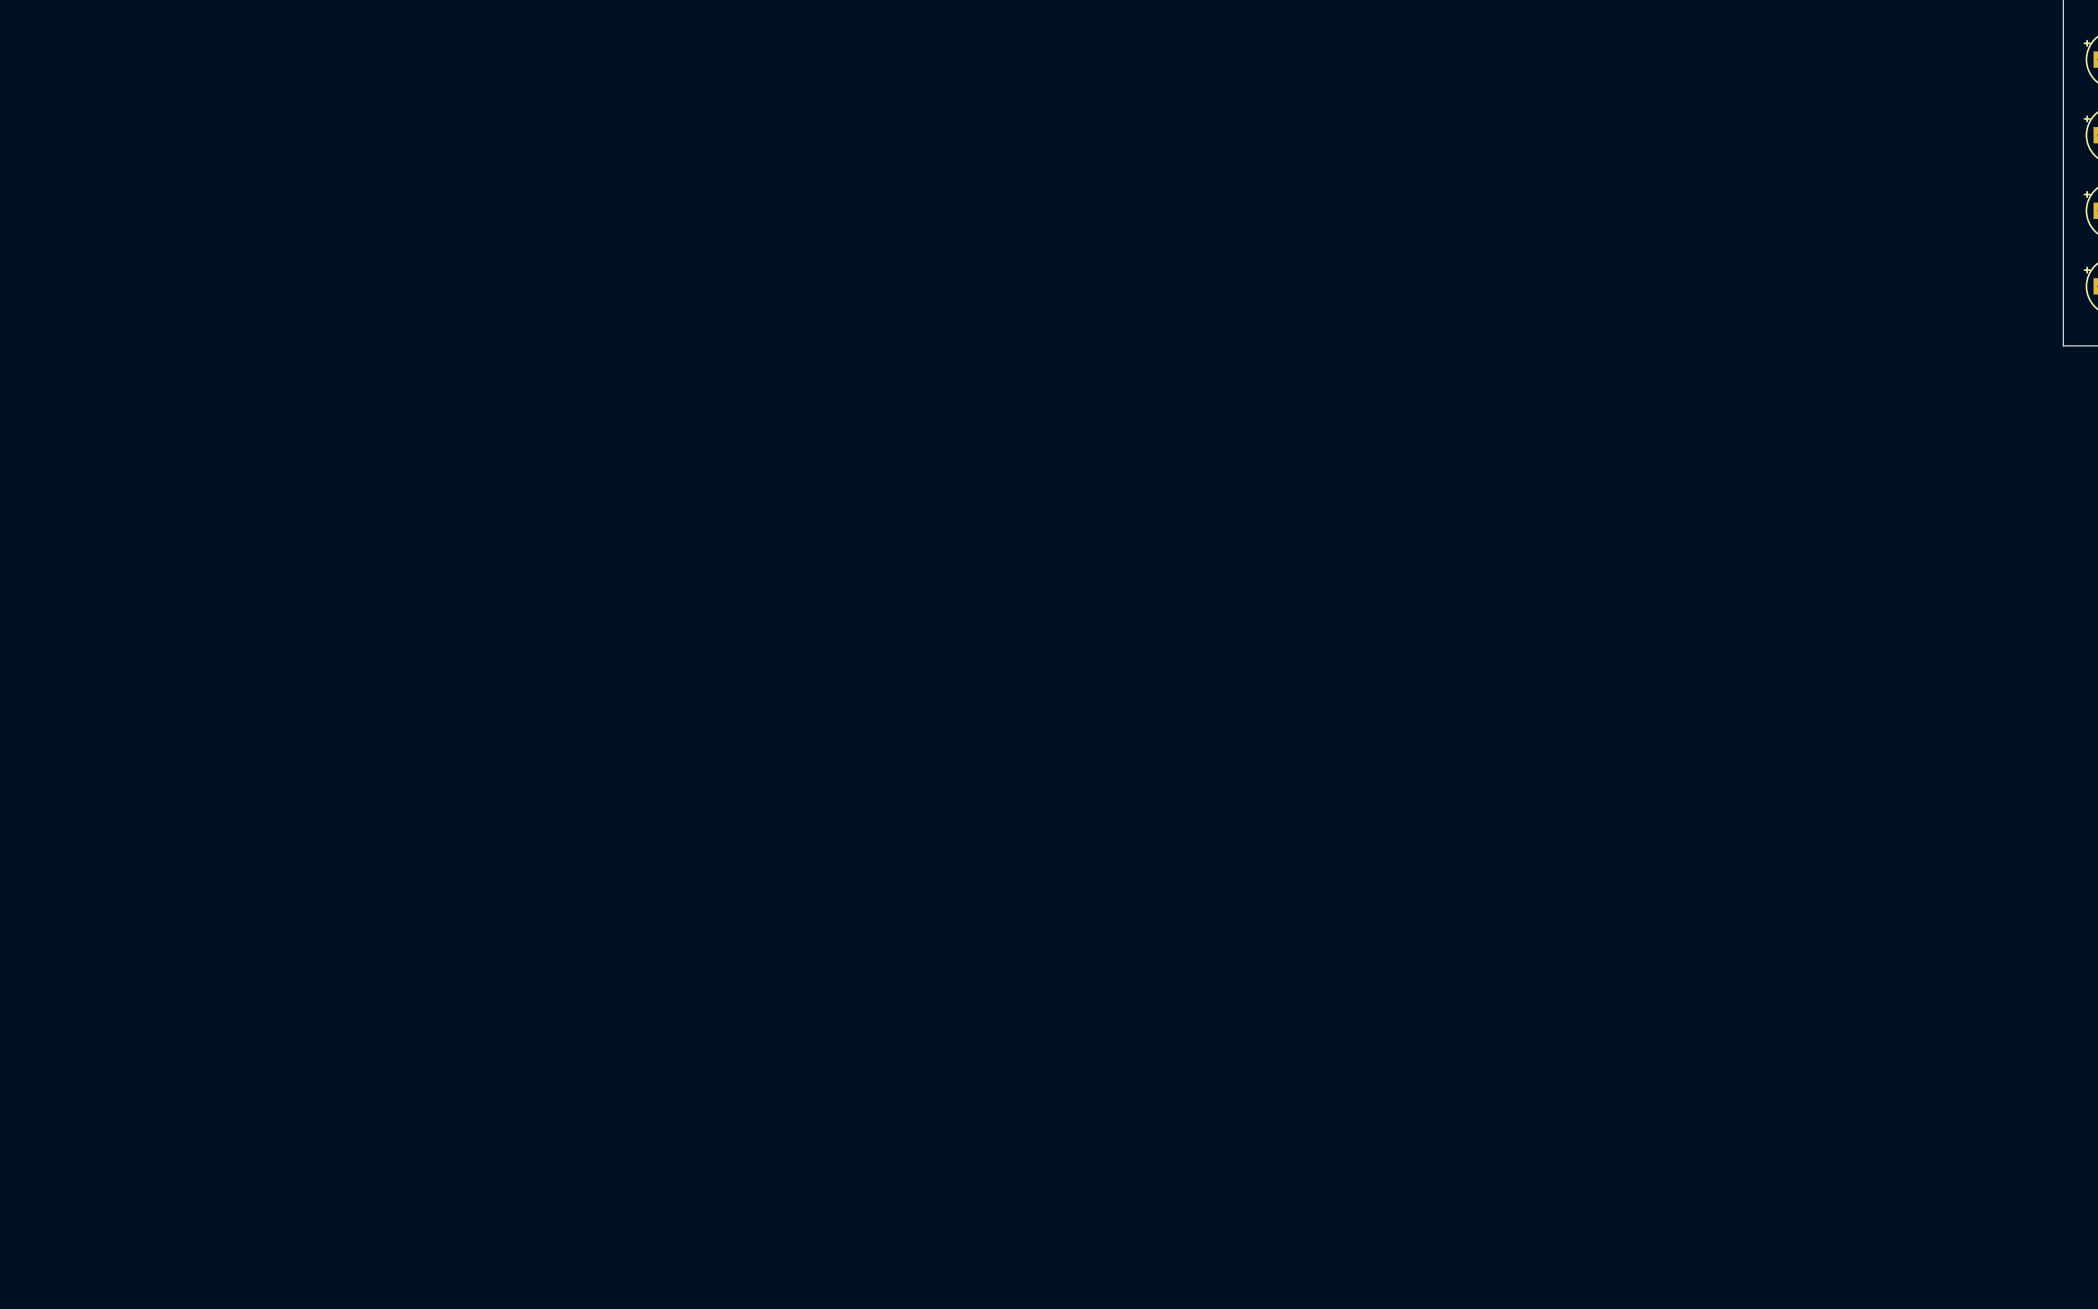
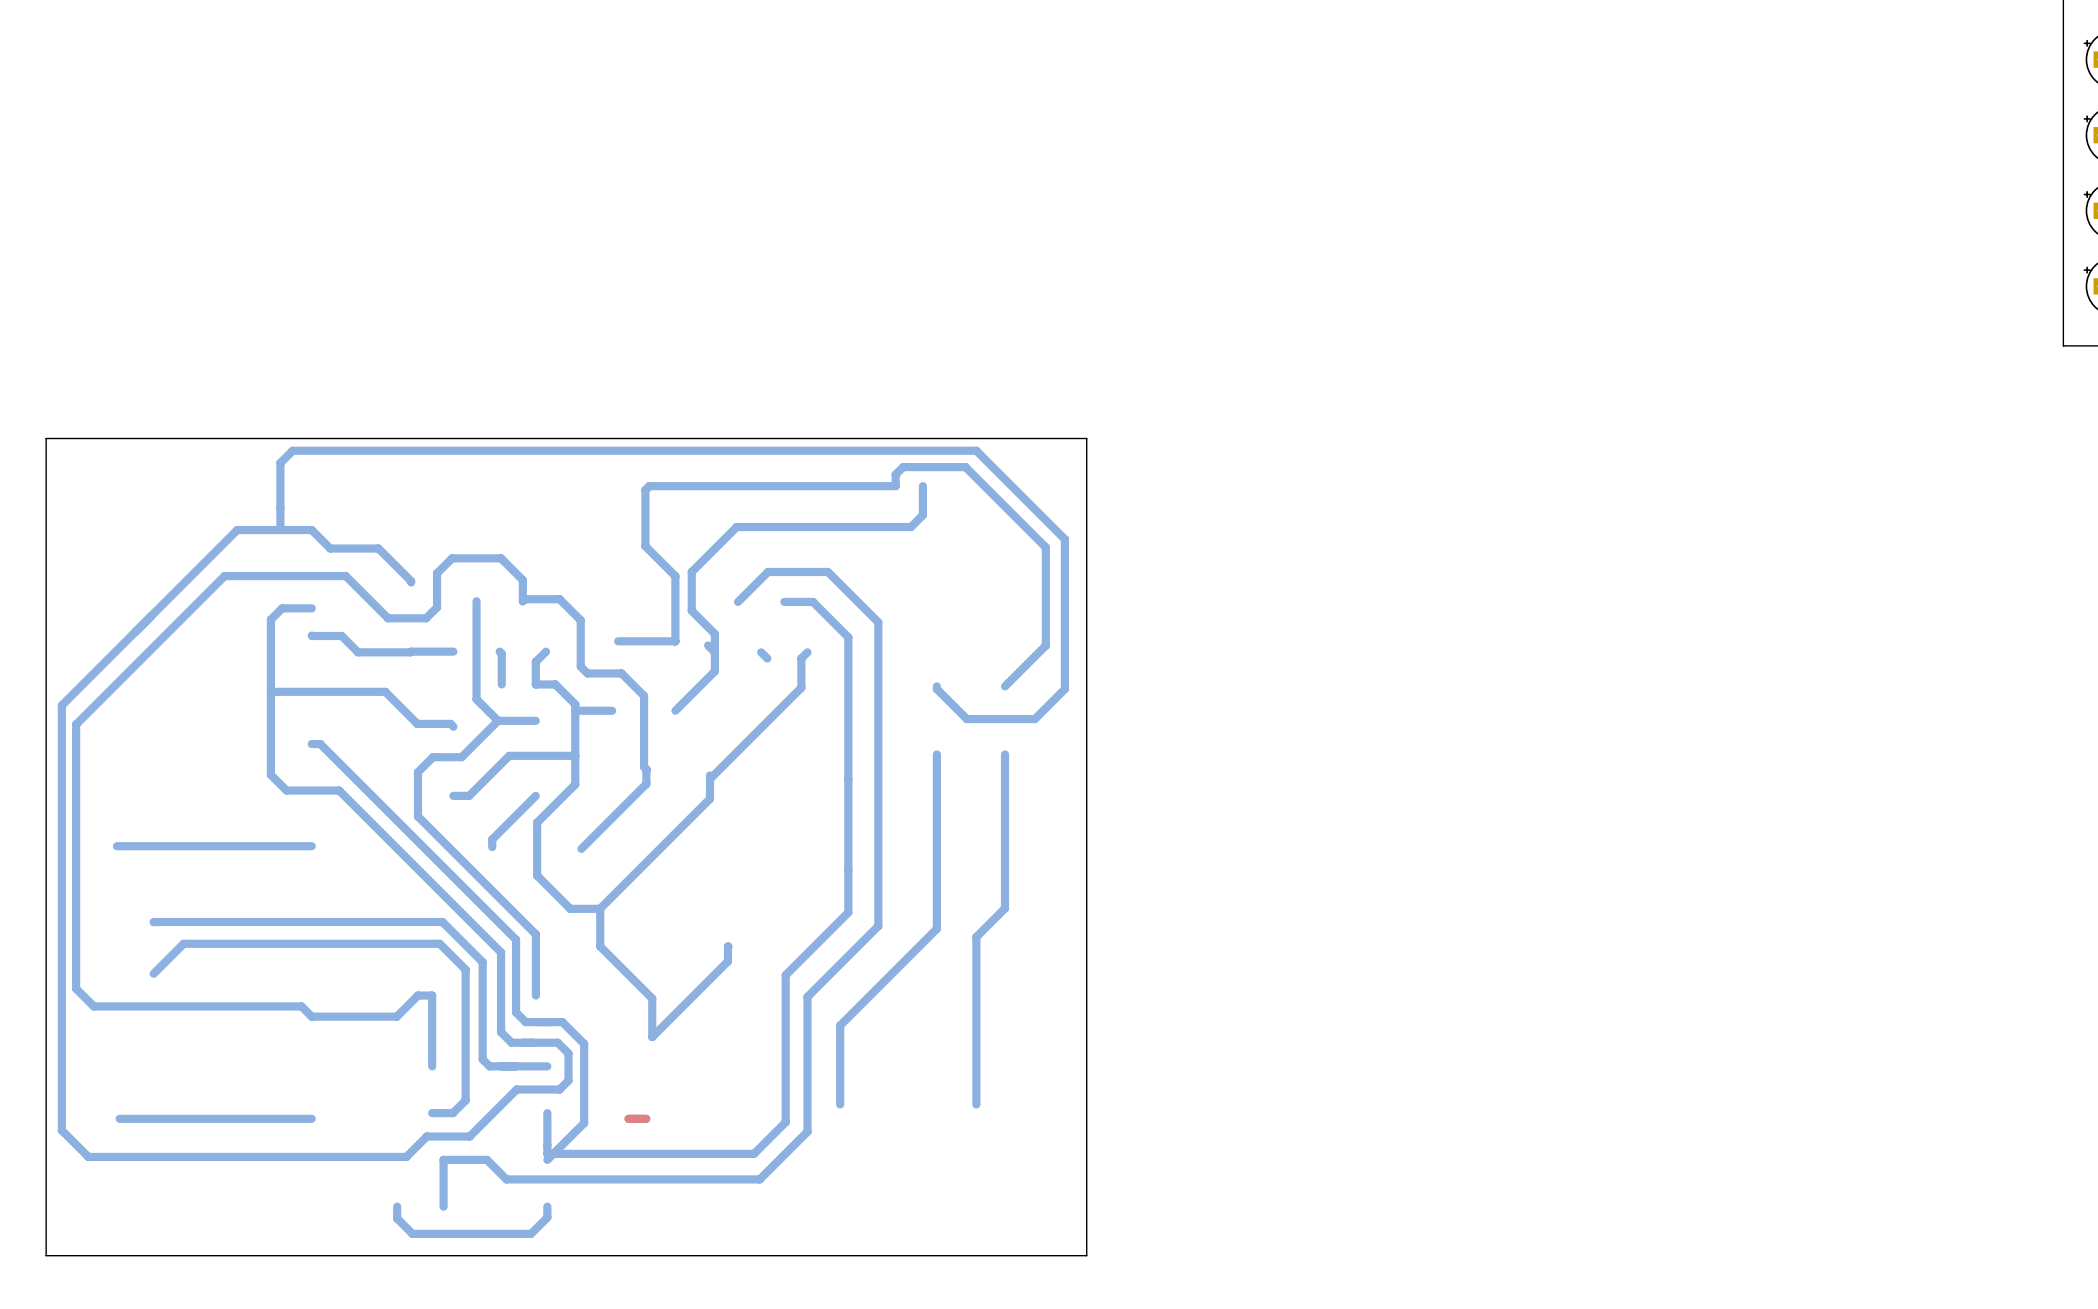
board edge: none -> (46, 438) (1086, 438) (1086, 1255) (46, 1255) (46, 438)
bottom track: none -> (922, 486) (922, 515) (911, 527) (736, 527) (691, 571) (691, 610) (714, 633) (714, 671) (675, 710)
bottom track: none -> (280, 530) (280, 463) (292, 450) (976, 450) (1064, 539) (1064, 689) (1034, 719) (966, 719) (936, 689) (936, 686)
bottom track: none -> (411, 582) (378, 548) (330, 548) (311, 530) (237, 530) (61, 705) (61, 1130) (88, 1156) (406, 1156) (426, 1136) (469, 1136) (516, 1089) (559, 1089) (568, 1080) (568, 1053) (557, 1042) (511, 1042) (501, 1032) (501, 952) (339, 790) (286, 790) (270, 774) (270, 619) (282, 608) (311, 608)
bottom track: none -> (476, 601) (476, 699) (498, 720)
bottom track: none -> (738, 601) (768, 571) (827, 571) (878, 622) (878, 926) (807, 996) (807, 1131) (759, 1179) (506, 1179) (486, 1159) (443, 1159) (443, 1206)
bottom track: none -> (784, 601) (812, 601) (848, 637) (848, 912) (785, 975) (785, 1122) (754, 1153) (547, 1153) (547, 1113)
bottom track: none -> (311, 635) (341, 635) (358, 652) (453, 651)
bottom track: none -> (618, 641) (675, 641) (675, 576) (645, 546) (645, 490) (649, 486) (895, 486) (895, 474) (903, 467) (965, 467) (1045, 547) (1045, 645) (1004, 686)
bottom track: none -> (708, 645) (714, 652)
bottom track: none -> (499, 651) (501, 653) (501, 684)
bottom track: none -> (546, 651) (535, 661) (535, 684) (555, 684) (575, 704) (575, 784) (537, 822) (537, 875) (570, 908) (600, 908)
bottom track: none -> (761, 652) (767, 658)
bottom track: none -> (807, 652) (801, 658) (801, 687) (710, 779)
bottom track: none -> (270, 691) (385, 691) (417, 723) (450, 723) (453, 726)
bottom track: none -> (575, 710) (612, 710)
bottom track: none -> (498, 720) (535, 720)
bottom track: none -> (498, 720) (461, 757) (432, 757) (417, 772) (417, 816) (535, 934) (535, 995)
bottom track: none -> (311, 744) (320, 744) (516, 939) (516, 1012) (525, 1022) (562, 1022) (584, 1043) (584, 1123) (547, 1159)
bottom track: none -> (936, 754) (936, 928) (840, 1025) (840, 1104)
bottom track: none -> (1004, 754) (1004, 908) (976, 936) (976, 1104)
bottom track: none -> (575, 755) (509, 755) (469, 795) (453, 795)
bottom track: none -> (709, 775) (709, 798) (600, 908) (600, 946) (652, 998) (652, 1037) (727, 961) (728, 946)
bottom track: none -> (535, 795) (492, 839) (492, 847)
bottom track: none -> (116, 846) (311, 846)
bottom track: none -> (581, 848) (646, 783) (646, 769) (644, 767) (644, 695) (621, 673) (587, 673) (580, 666) (580, 620) (559, 599) (524, 599) (522, 601) (522, 580) (501, 558) (452, 558) (437, 573) (437, 607) (426, 618) (388, 618) (345, 576) (224, 576) (76, 724) (76, 988) (93, 1006) (301, 1006) (311, 1016) (396, 1016) (417, 995) (432, 995) (432, 1066)
bottom track: none -> (153, 922) (442, 922) (482, 962) (482, 1059) (489, 1066) (547, 1066)
bottom track: none -> (153, 973) (183, 943) (439, 943) (465, 969) (465, 1100) (452, 1113) (432, 1113)
bottom track: none -> (119, 1118) (311, 1118)
top track: none -> (628, 1118) (646, 1118)
bottom track: none -> (397, 1206) (397, 1218) (412, 1233) (531, 1233) (547, 1217) (547, 1206)

